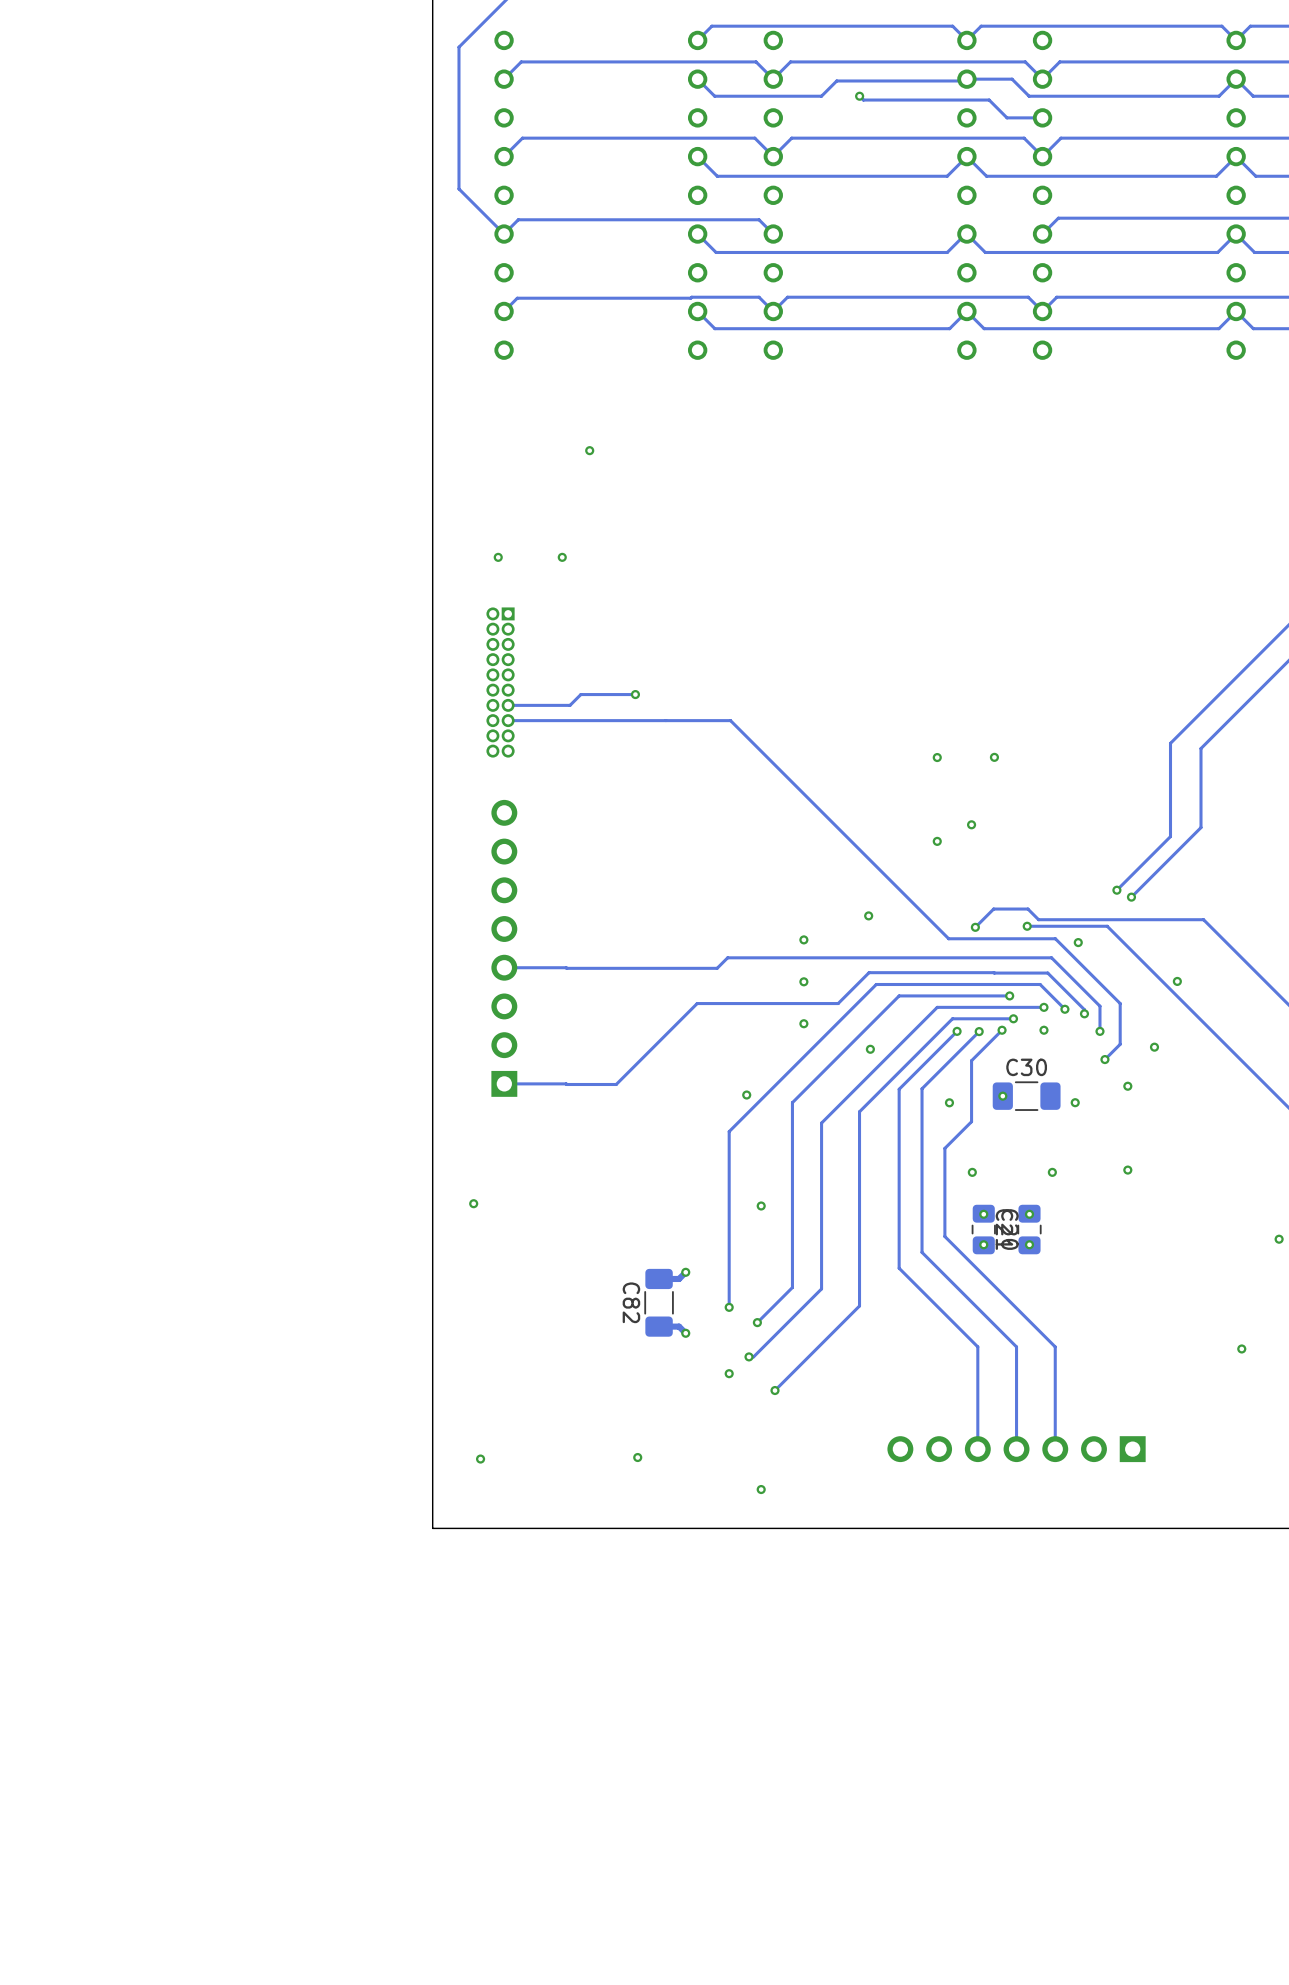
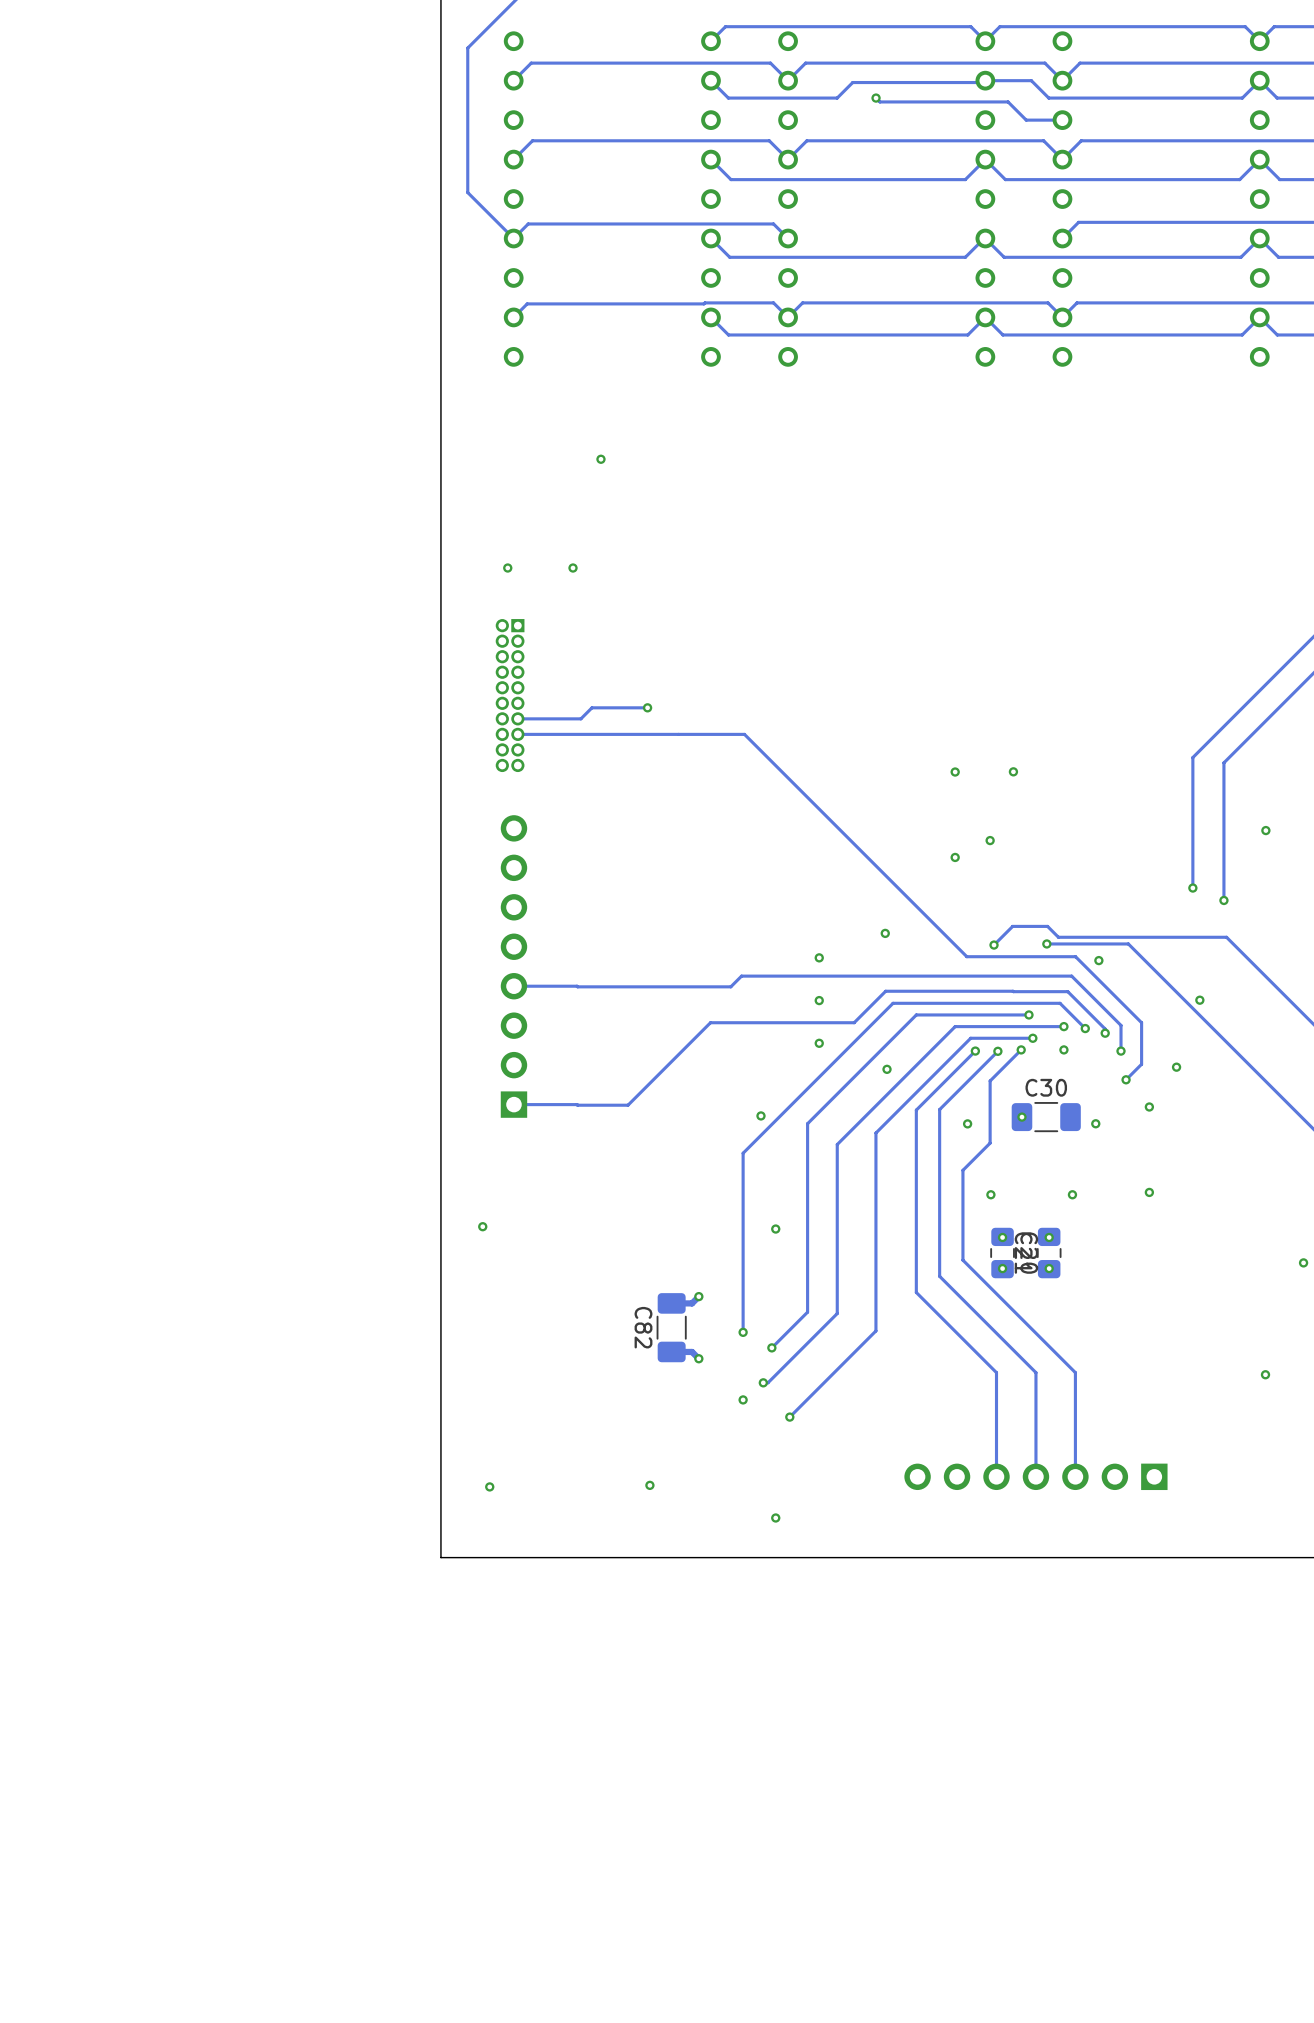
via: none -> (1265, 830)
track: (1200, 827) (1131, 897) -> (1223, 843) (1223, 900)
track: (1170, 836) (1116, 890) -> (1192, 852) (1192, 888)
via: none -> (1192, 888)
via: none -> (1223, 900)
via: (1116, 890) -> none
via: (1131, 897) -> none

